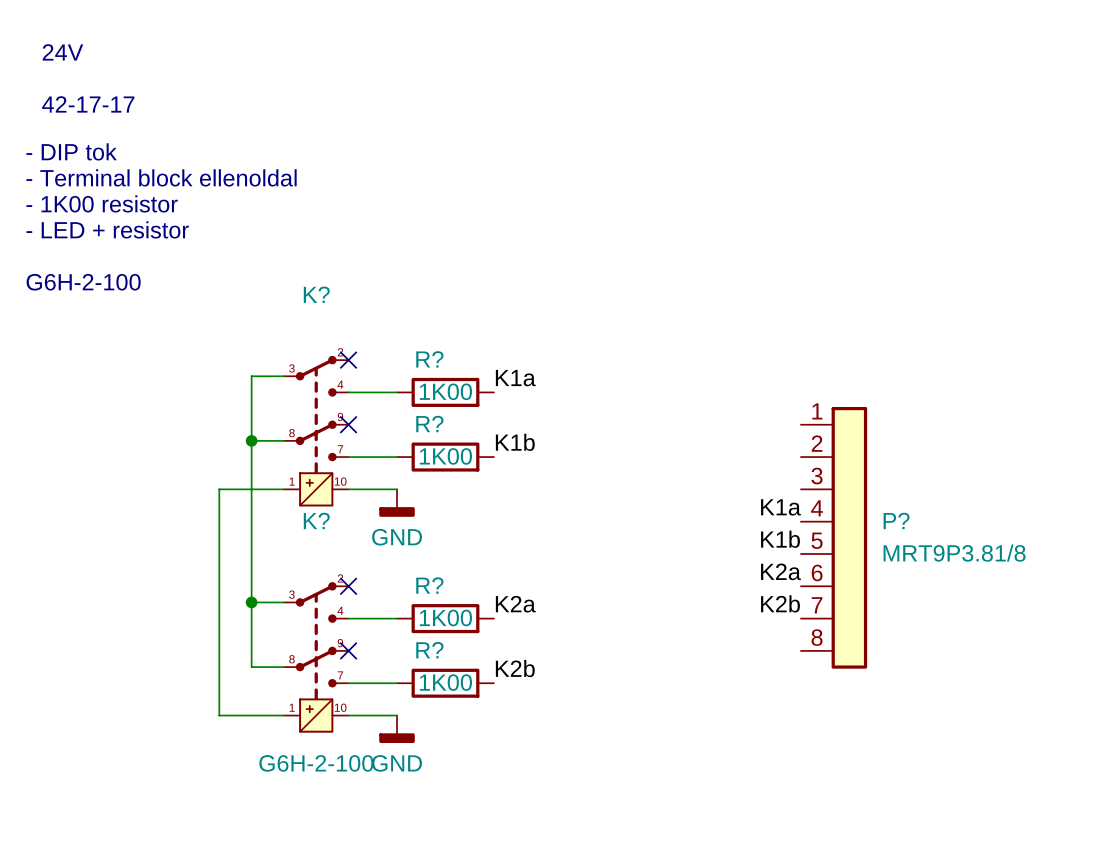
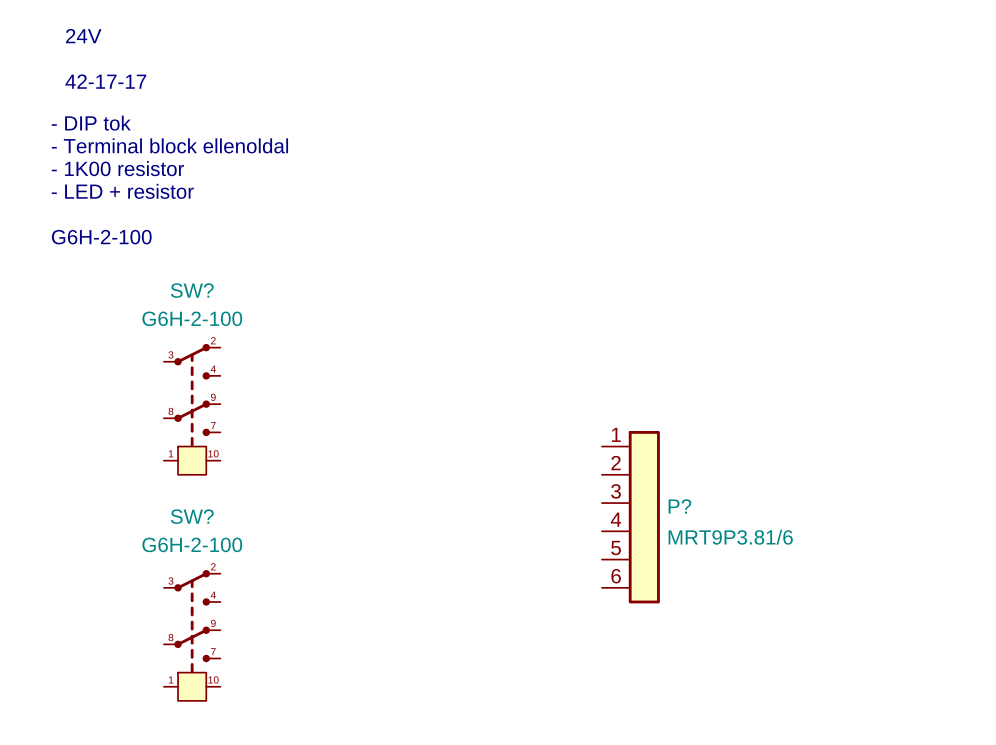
no-connect mark: (348, 360) -> none
wire: (283, 376) (251, 376) (251, 667) (283, 667) -> none
label: K1a (515, 378) -> none
wire: (348, 392) (397, 392) -> none
R?: (445, 392) -> none
no-connect mark: (348, 424) -> none
K?: (316, 431) -> none
wire: (251, 440) (283, 440) -> none
junction: (251, 440) -> none
label: K1b (515, 442) -> none
wire: (348, 457) (397, 457) -> none
R?: (445, 457) -> none
SW?: none -> (192, 409)
wire: (283, 489) (219, 489) (219, 715) (283, 715) -> none
wire: (348, 489) (397, 489) -> none
power symbol: GND (397, 503) -> none
label: K1a (780, 507) -> none
P?: (834, 537) -> none
label: K1b (780, 539) -> none
label: K2a (780, 571) -> none
no-connect mark: (348, 586) -> none
wire: (251, 602) (283, 602) -> none
junction: (251, 602) -> none
P?: none -> (630, 517)
label: K2b (780, 603) -> none
label: K2a (515, 604) -> none
wire: (348, 618) (397, 618) -> none
R?: (445, 618) -> none
no-connect mark: (348, 650) -> none
K?: (316, 657) -> none
label: K2b (515, 668) -> none
wire: (348, 683) (397, 683) -> none
R?: (445, 683) -> none
wire: (348, 715) (397, 715) -> none
power symbol: GND (397, 729) -> none
SW?: none -> (192, 635)

